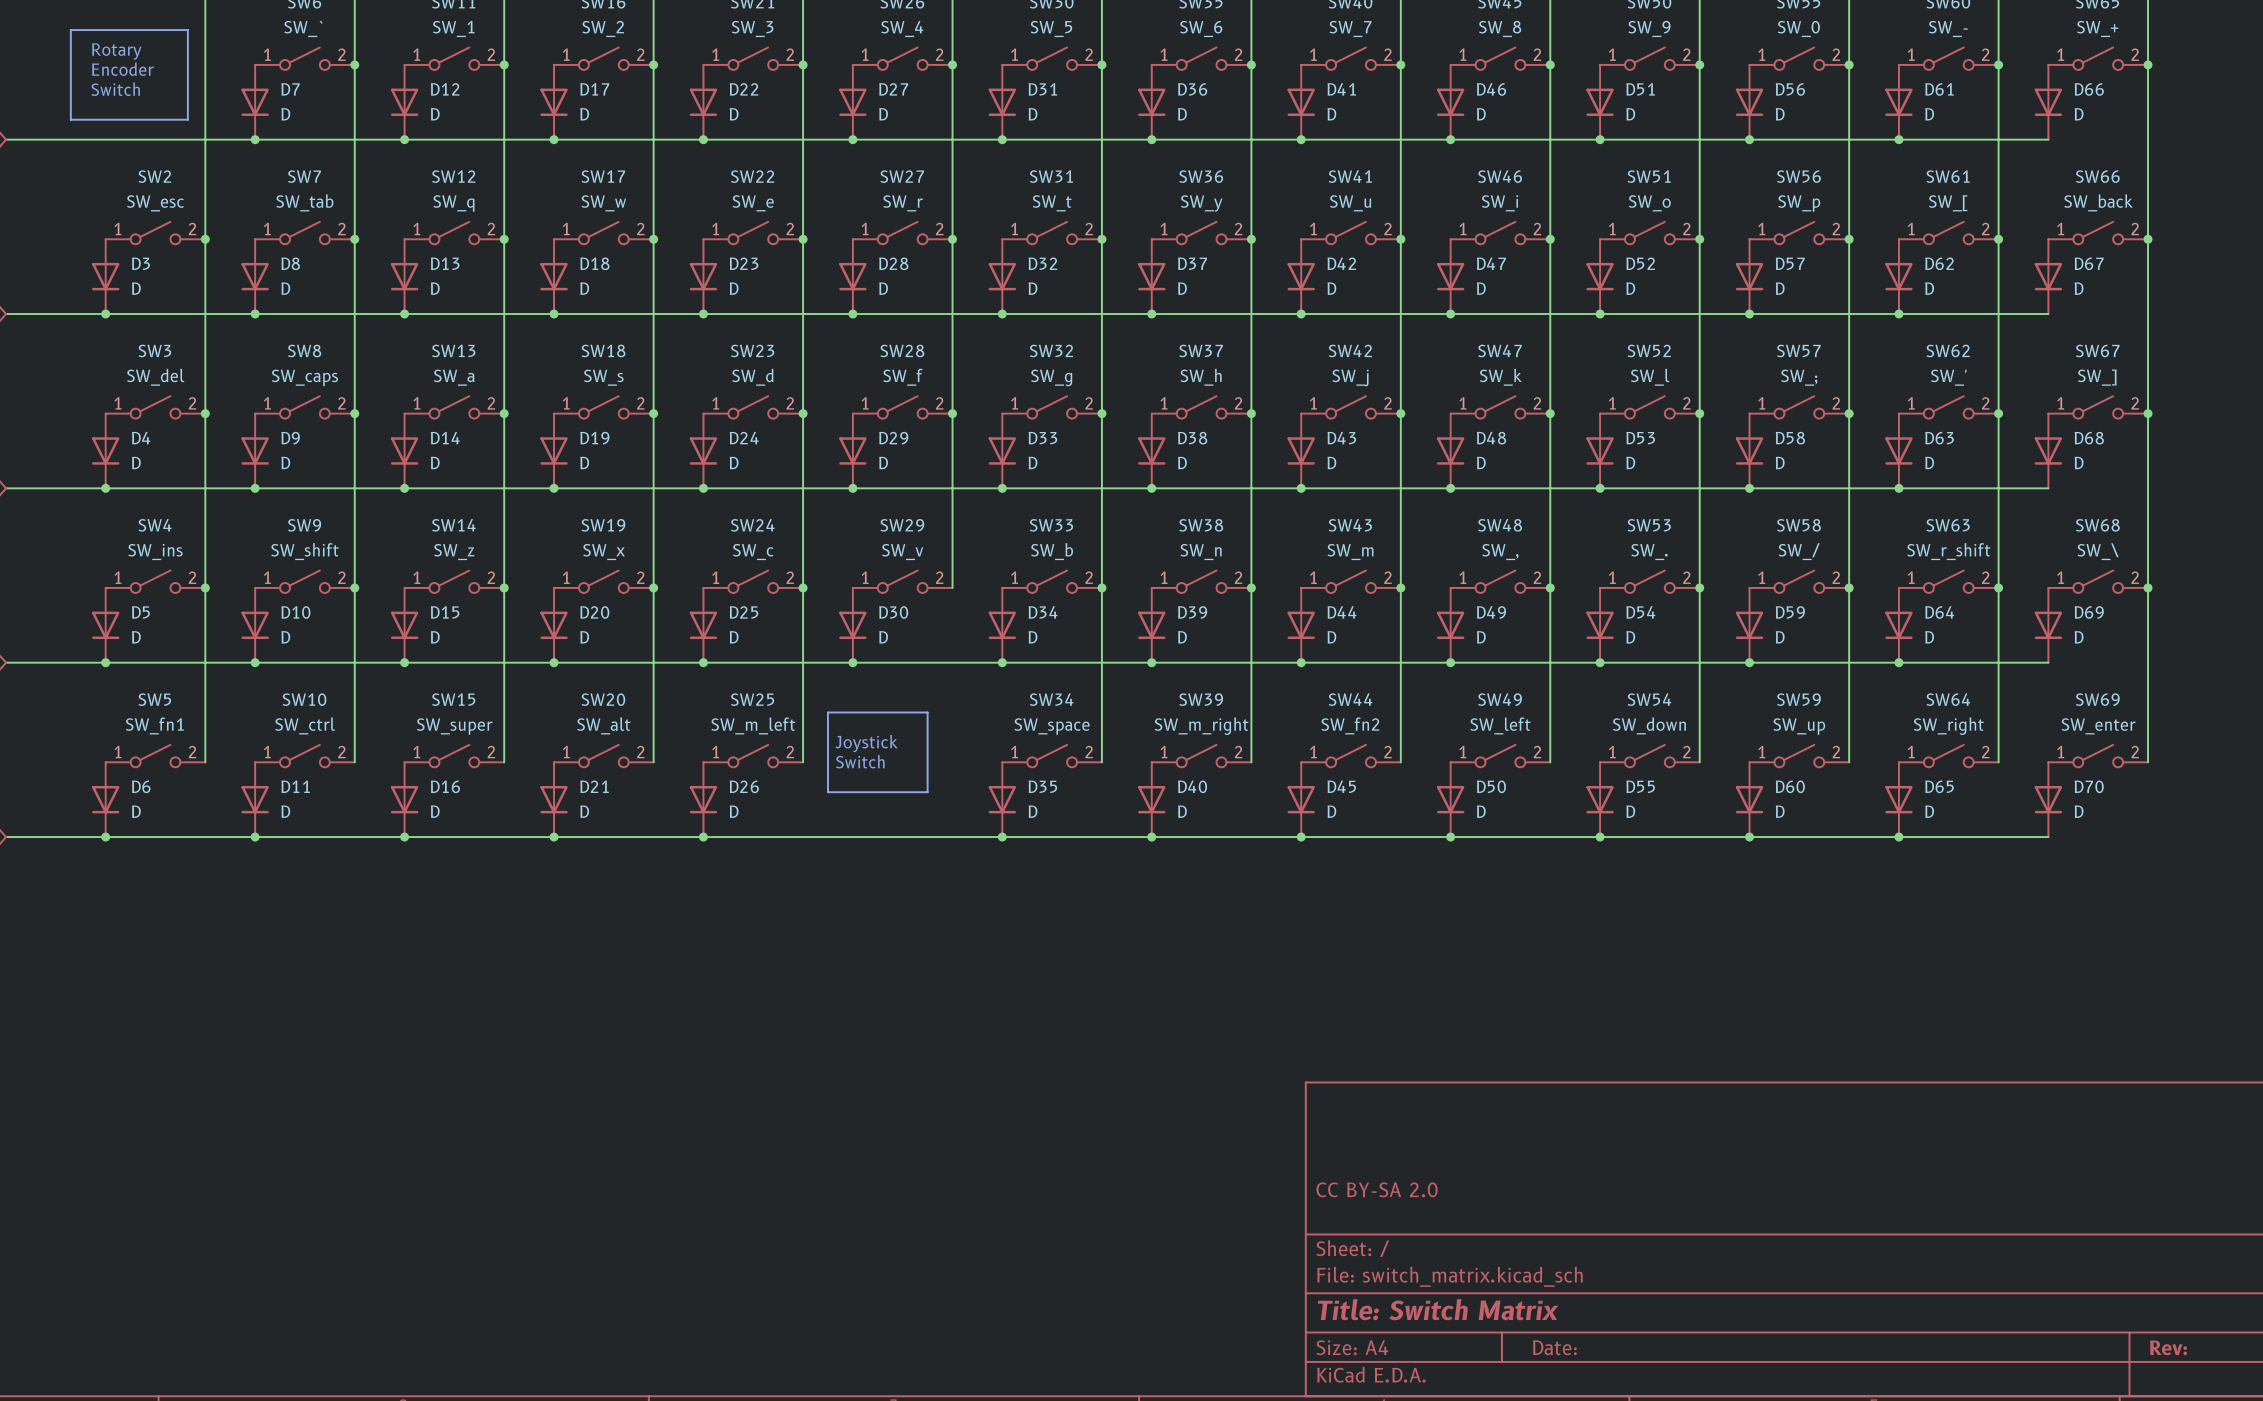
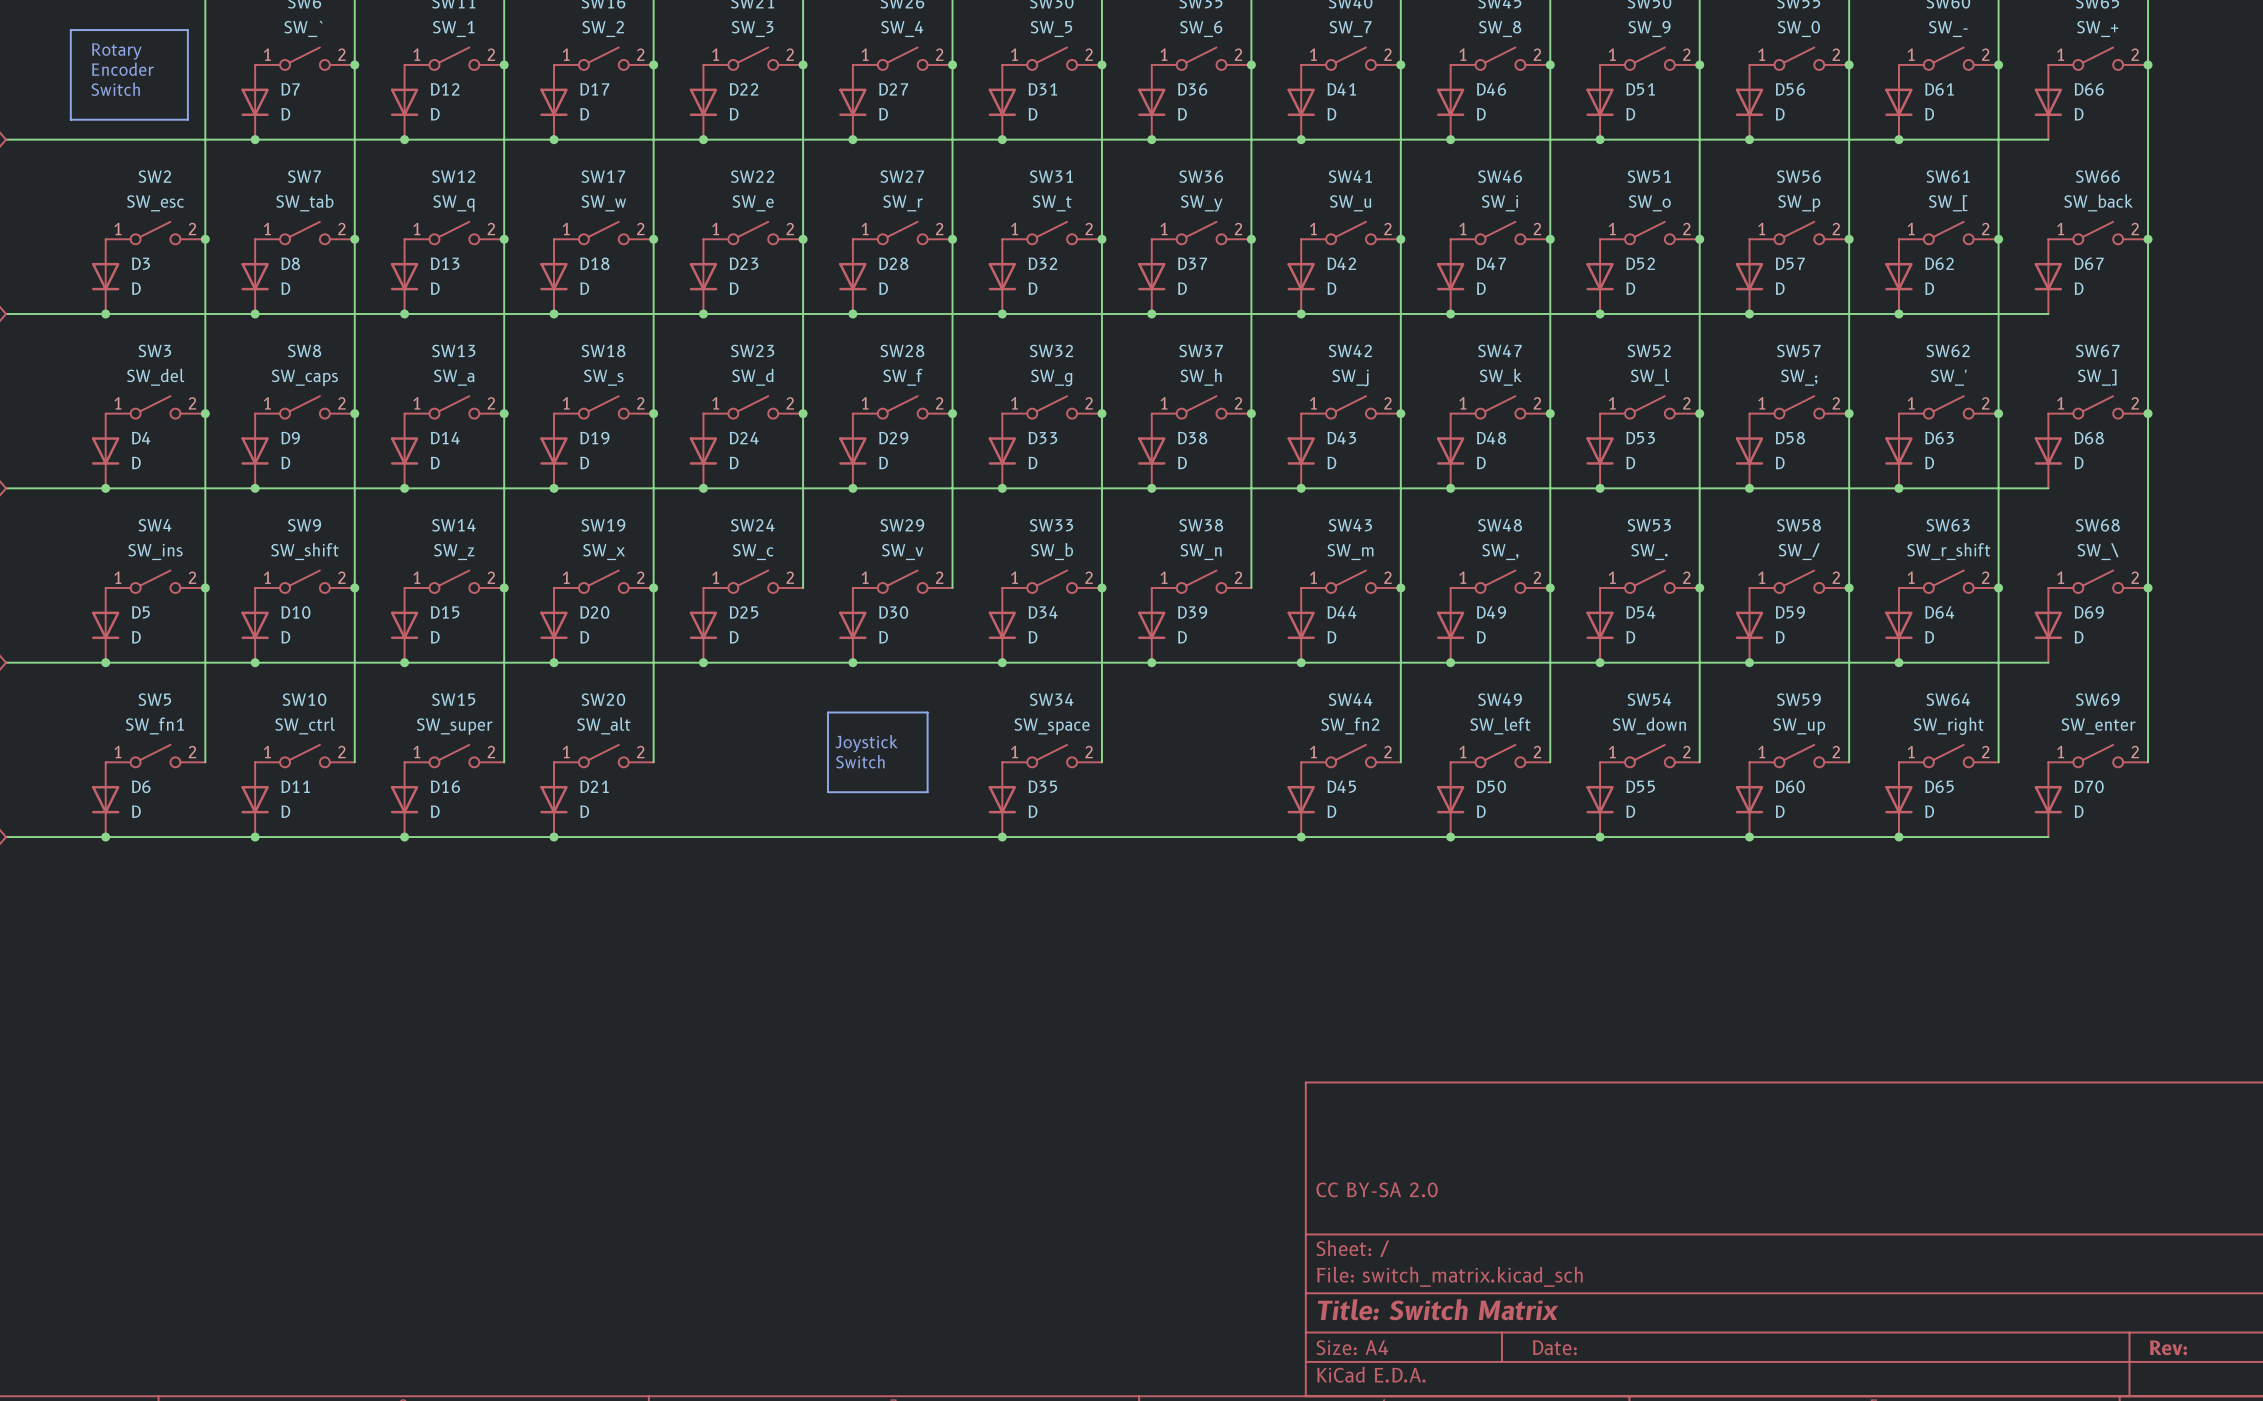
wire: (803, 587) (803, 762) -> none
junction: (803, 587) -> none
wire: (1251, 587) (1251, 762) -> none
junction: (1251, 587) -> none
SW25: SW_m_left (753, 756) -> none
SW39: SW_m_right (1201, 756) -> none
D26: D (703, 799) -> none
D40: D (1151, 799) -> none
junction: (703, 837) -> none
junction: (1151, 837) -> none

